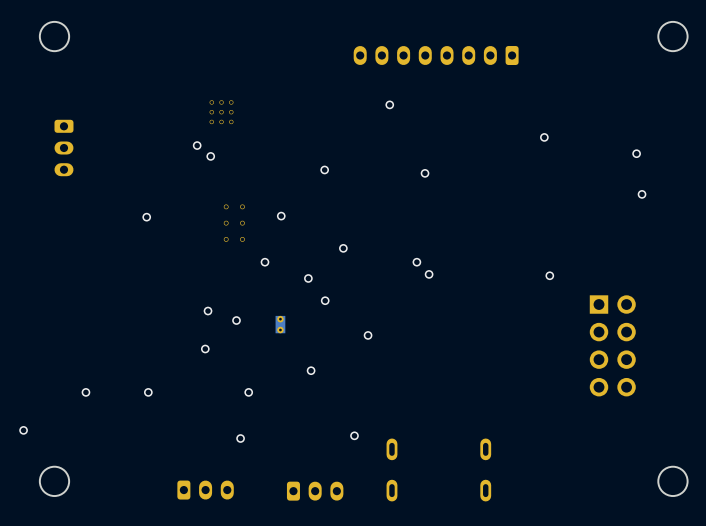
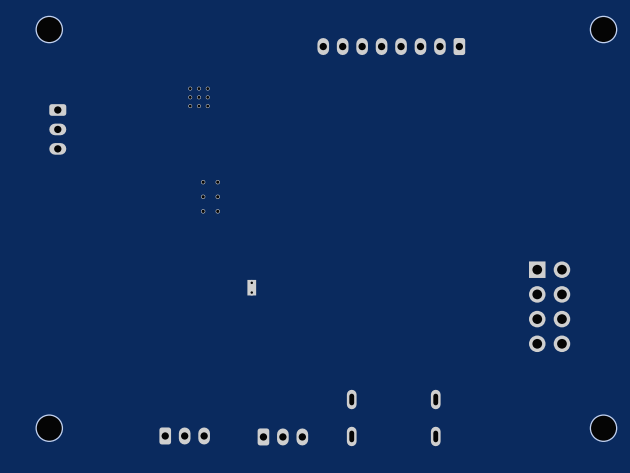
via: (389, 104) -> none
via: (544, 137) -> none
via: (197, 145) -> none
via: (636, 153) -> none
via: (210, 156) -> none
via: (324, 169) -> none
via: (425, 173) -> none
via: (642, 194) -> none
via: (281, 216) -> none
via: (146, 217) -> none
via: (343, 248) -> none
via: (264, 262) -> none
via: (416, 262) -> none
via: (429, 274) -> none
via: (549, 275) -> none
via: (308, 278) -> none
via: (325, 300) -> none
via: (208, 311) -> none
via: (236, 320) -> none
via: (368, 335) -> none
via: (205, 349) -> none
via: (311, 370) -> none
via: (85, 392) -> none
via: (148, 392) -> none
via: (248, 392) -> none
via: (23, 430) -> none
via: (354, 435) -> none
via: (240, 438) -> none

